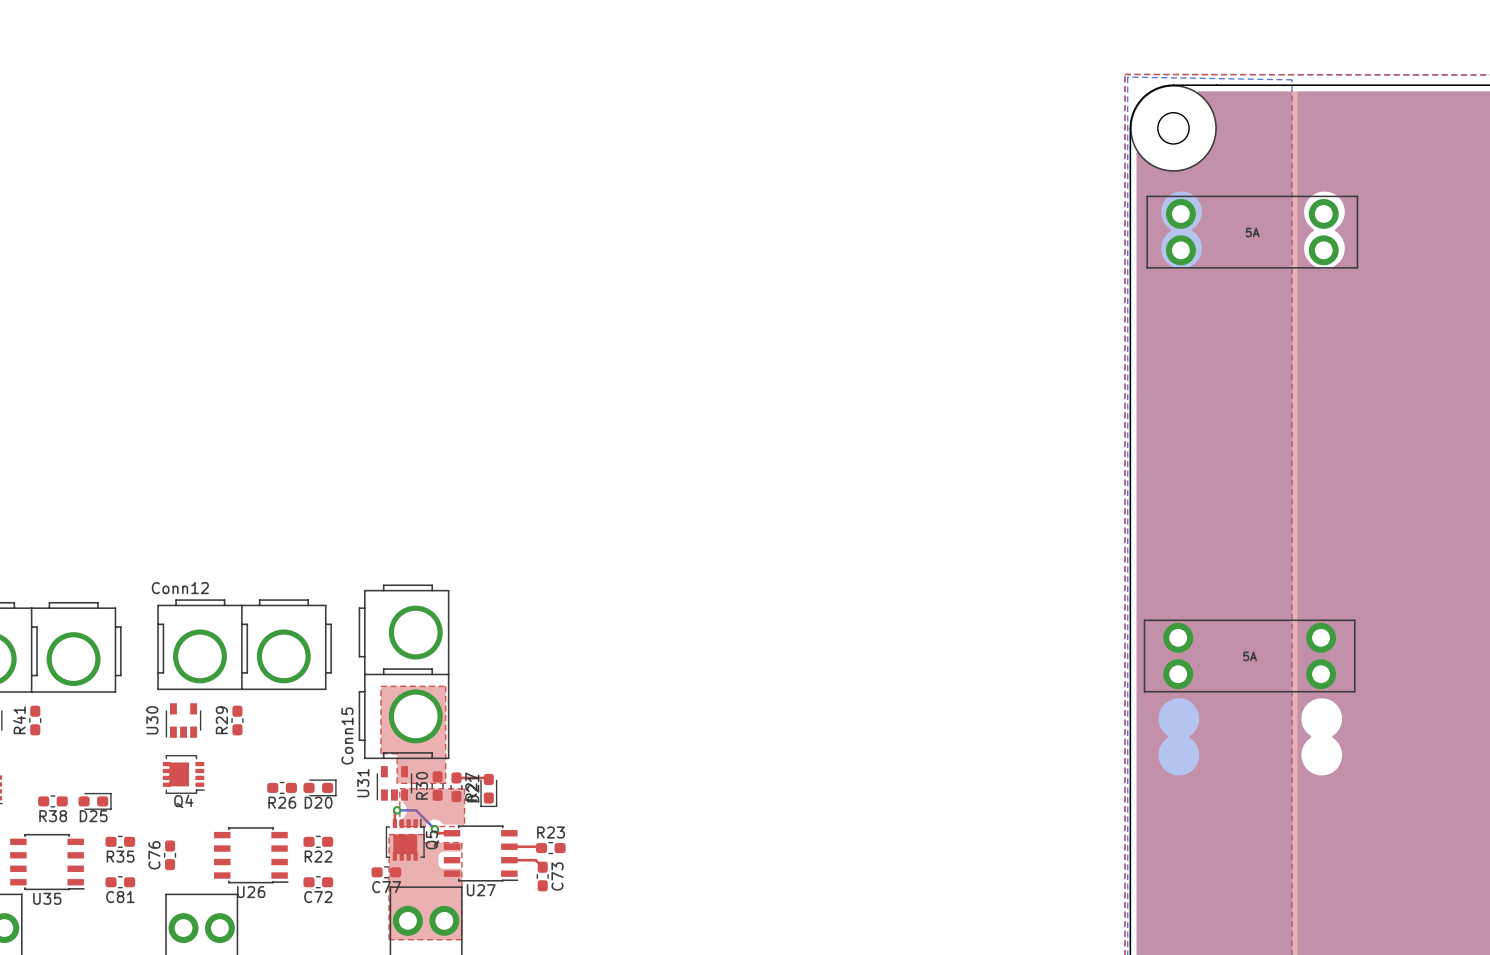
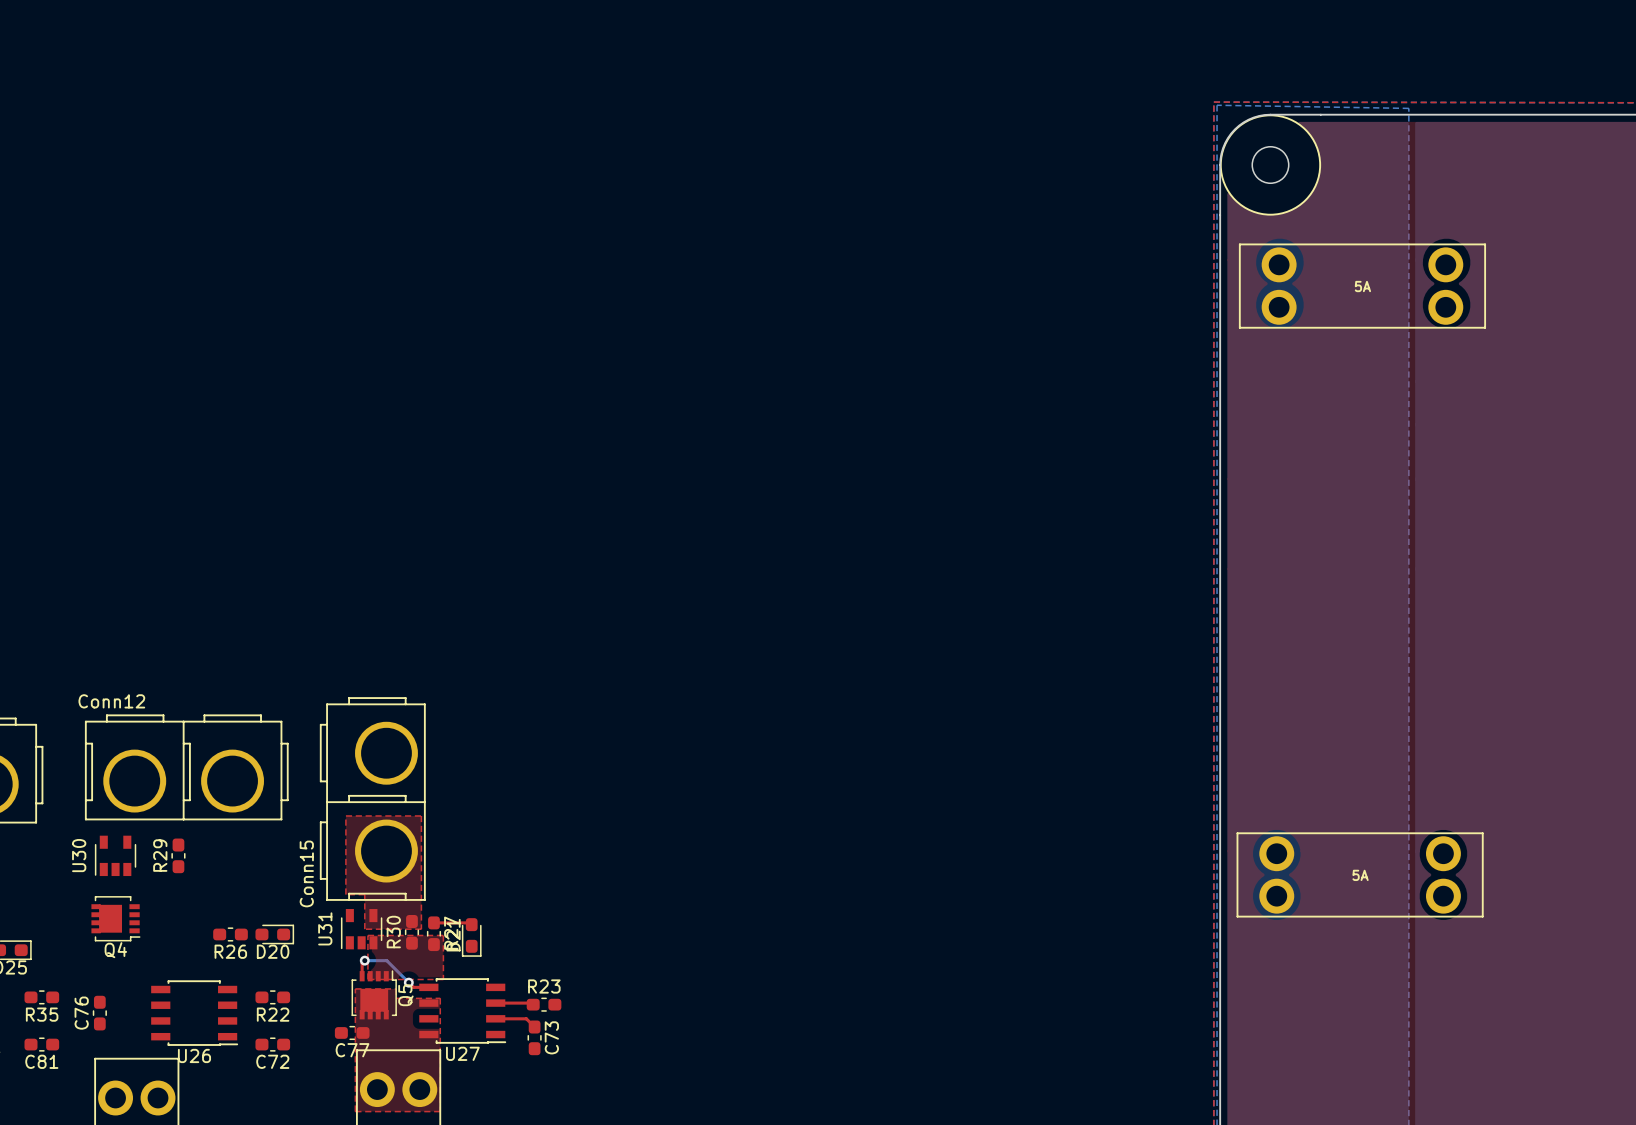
part position: (1249, 656) -> (1360, 874)

